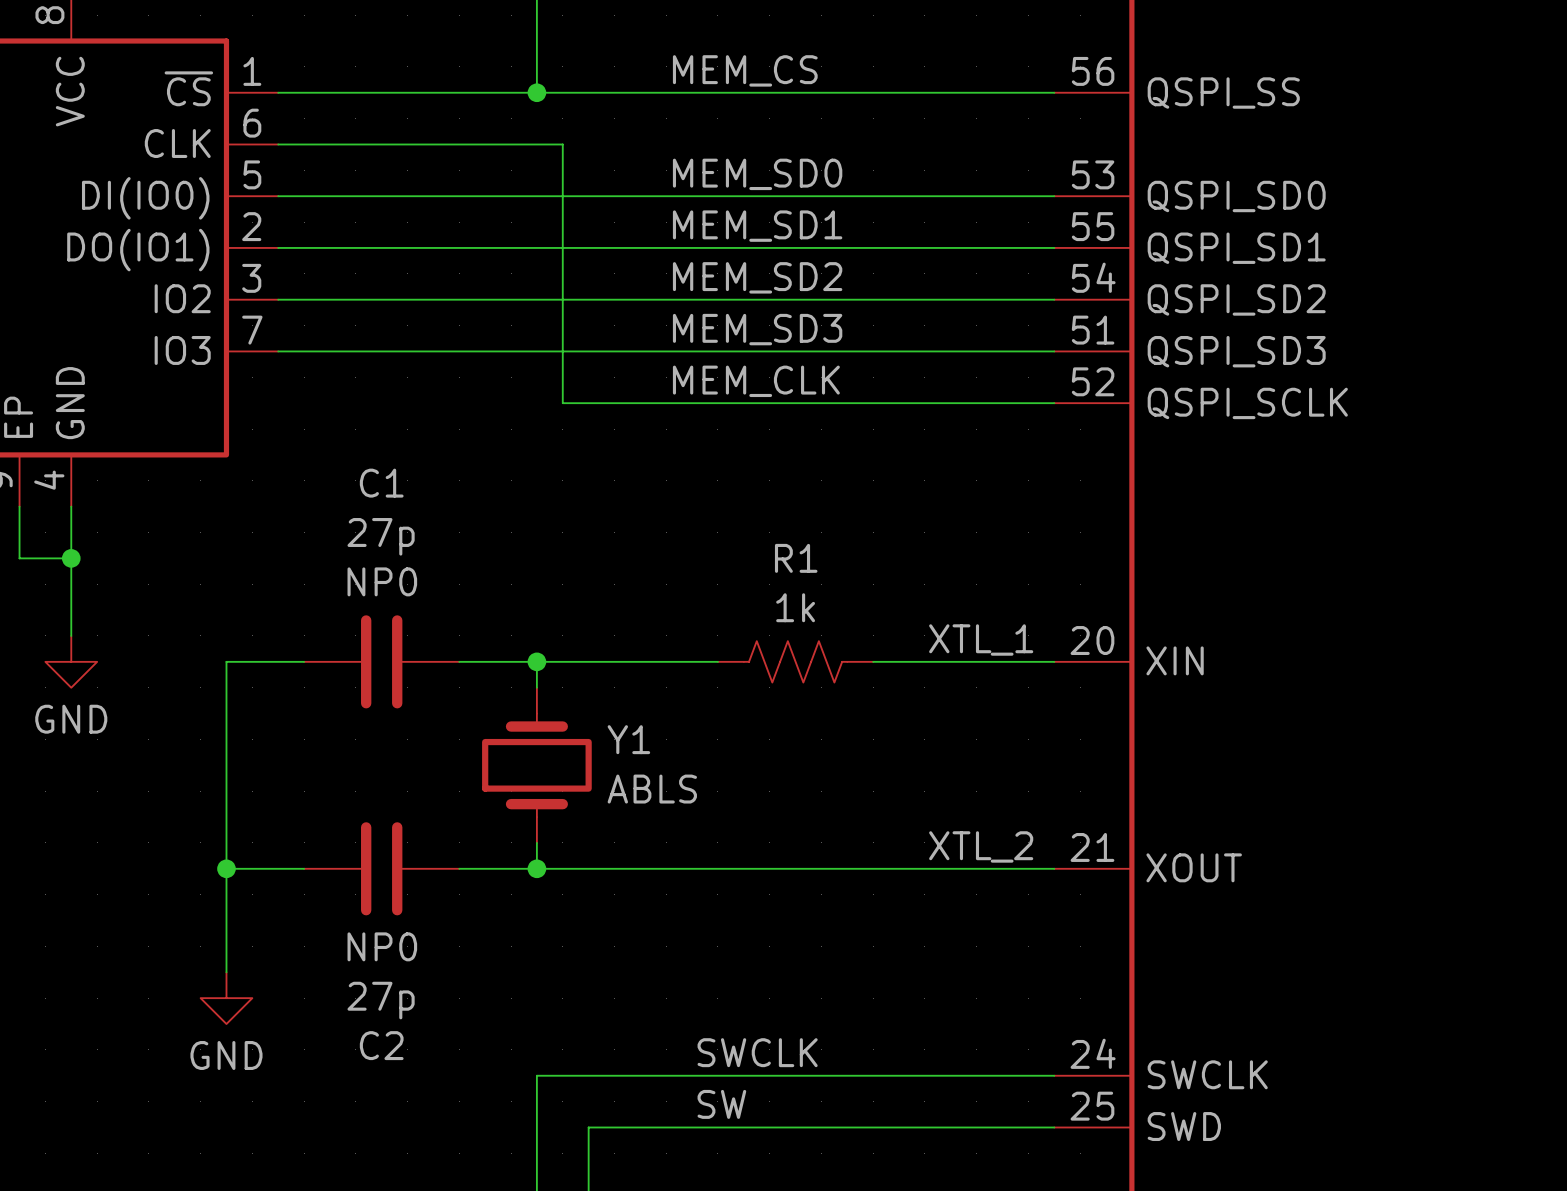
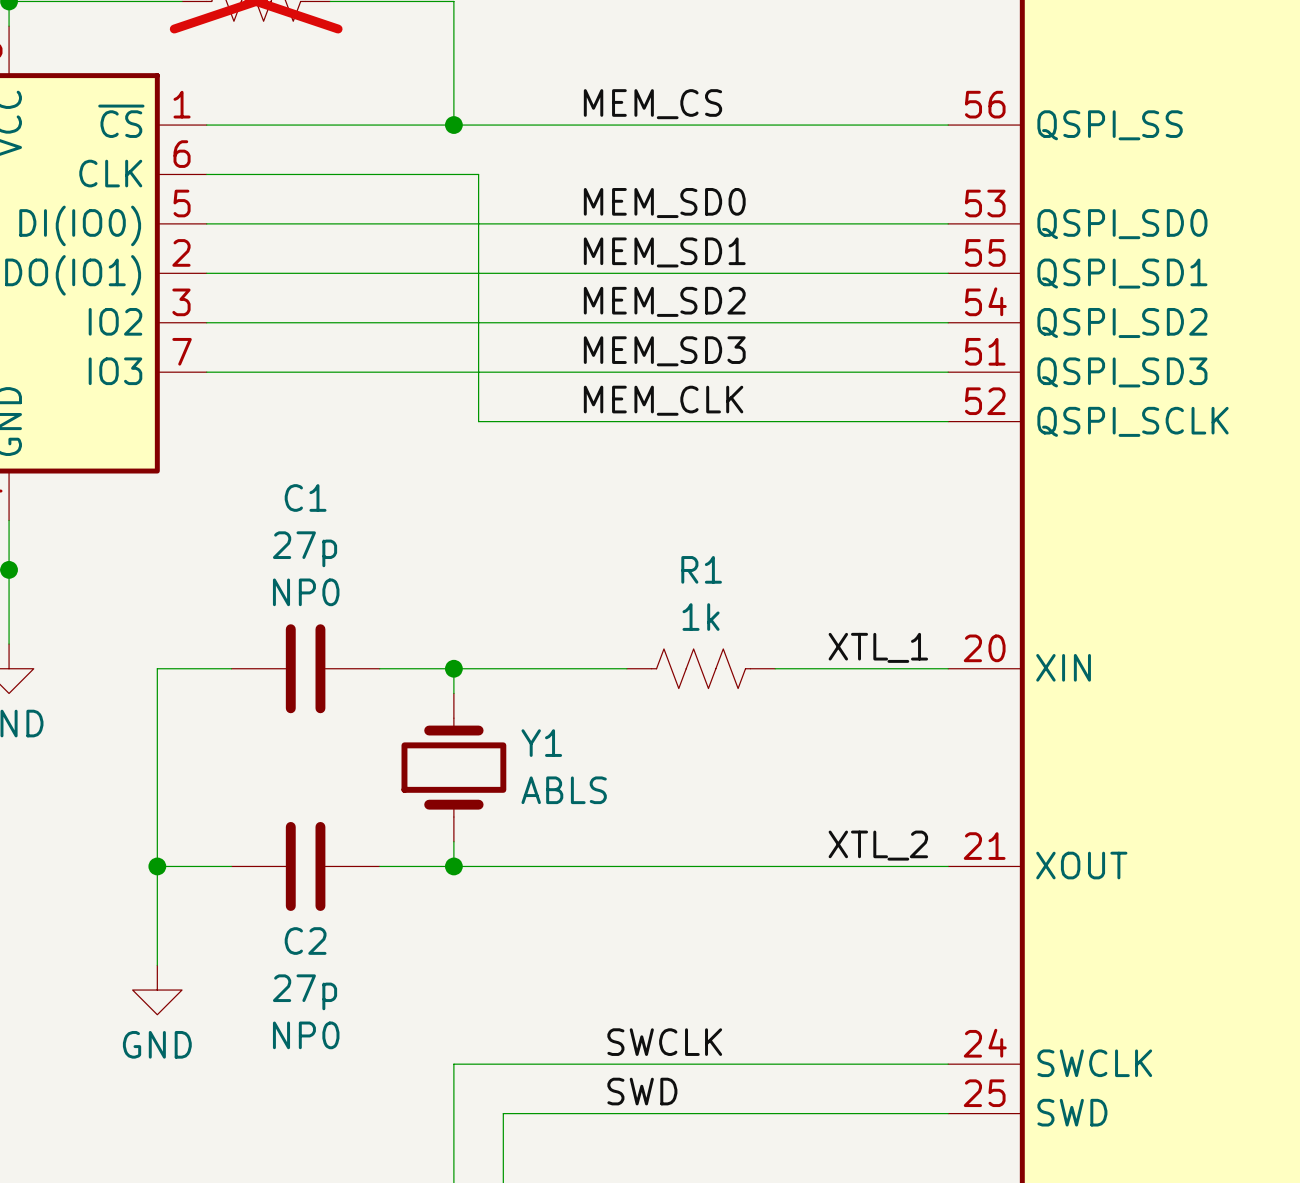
C2 text position: NP0 (382, 946) -> NP0 (306, 1035)
C2 name position: C2 (381, 1045) -> C2 (305, 941)
label: SW (721, 1104) -> SWD (642, 1091)

